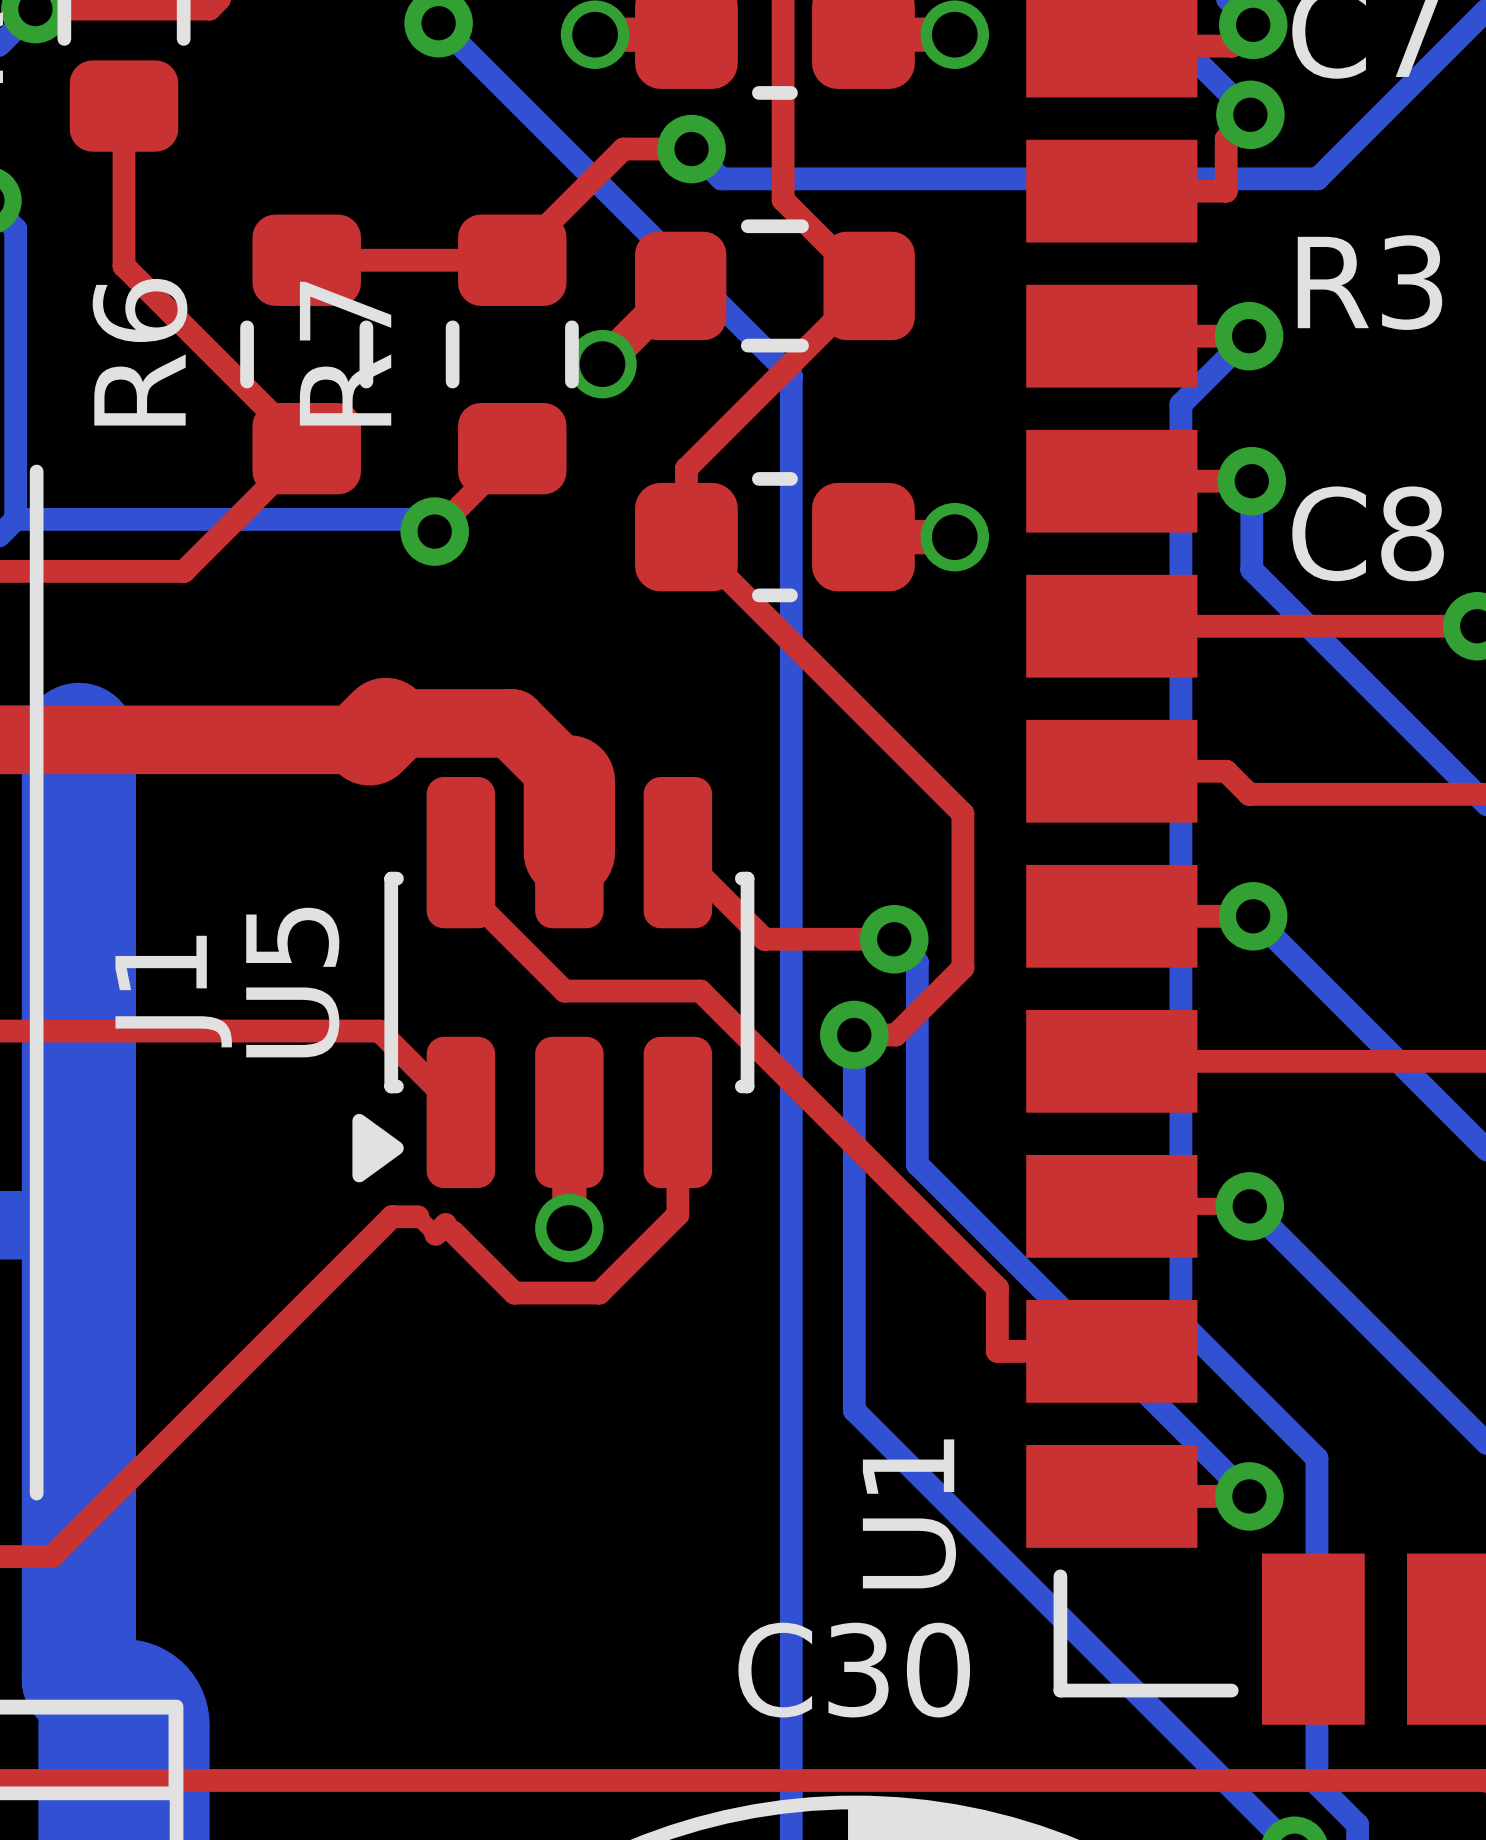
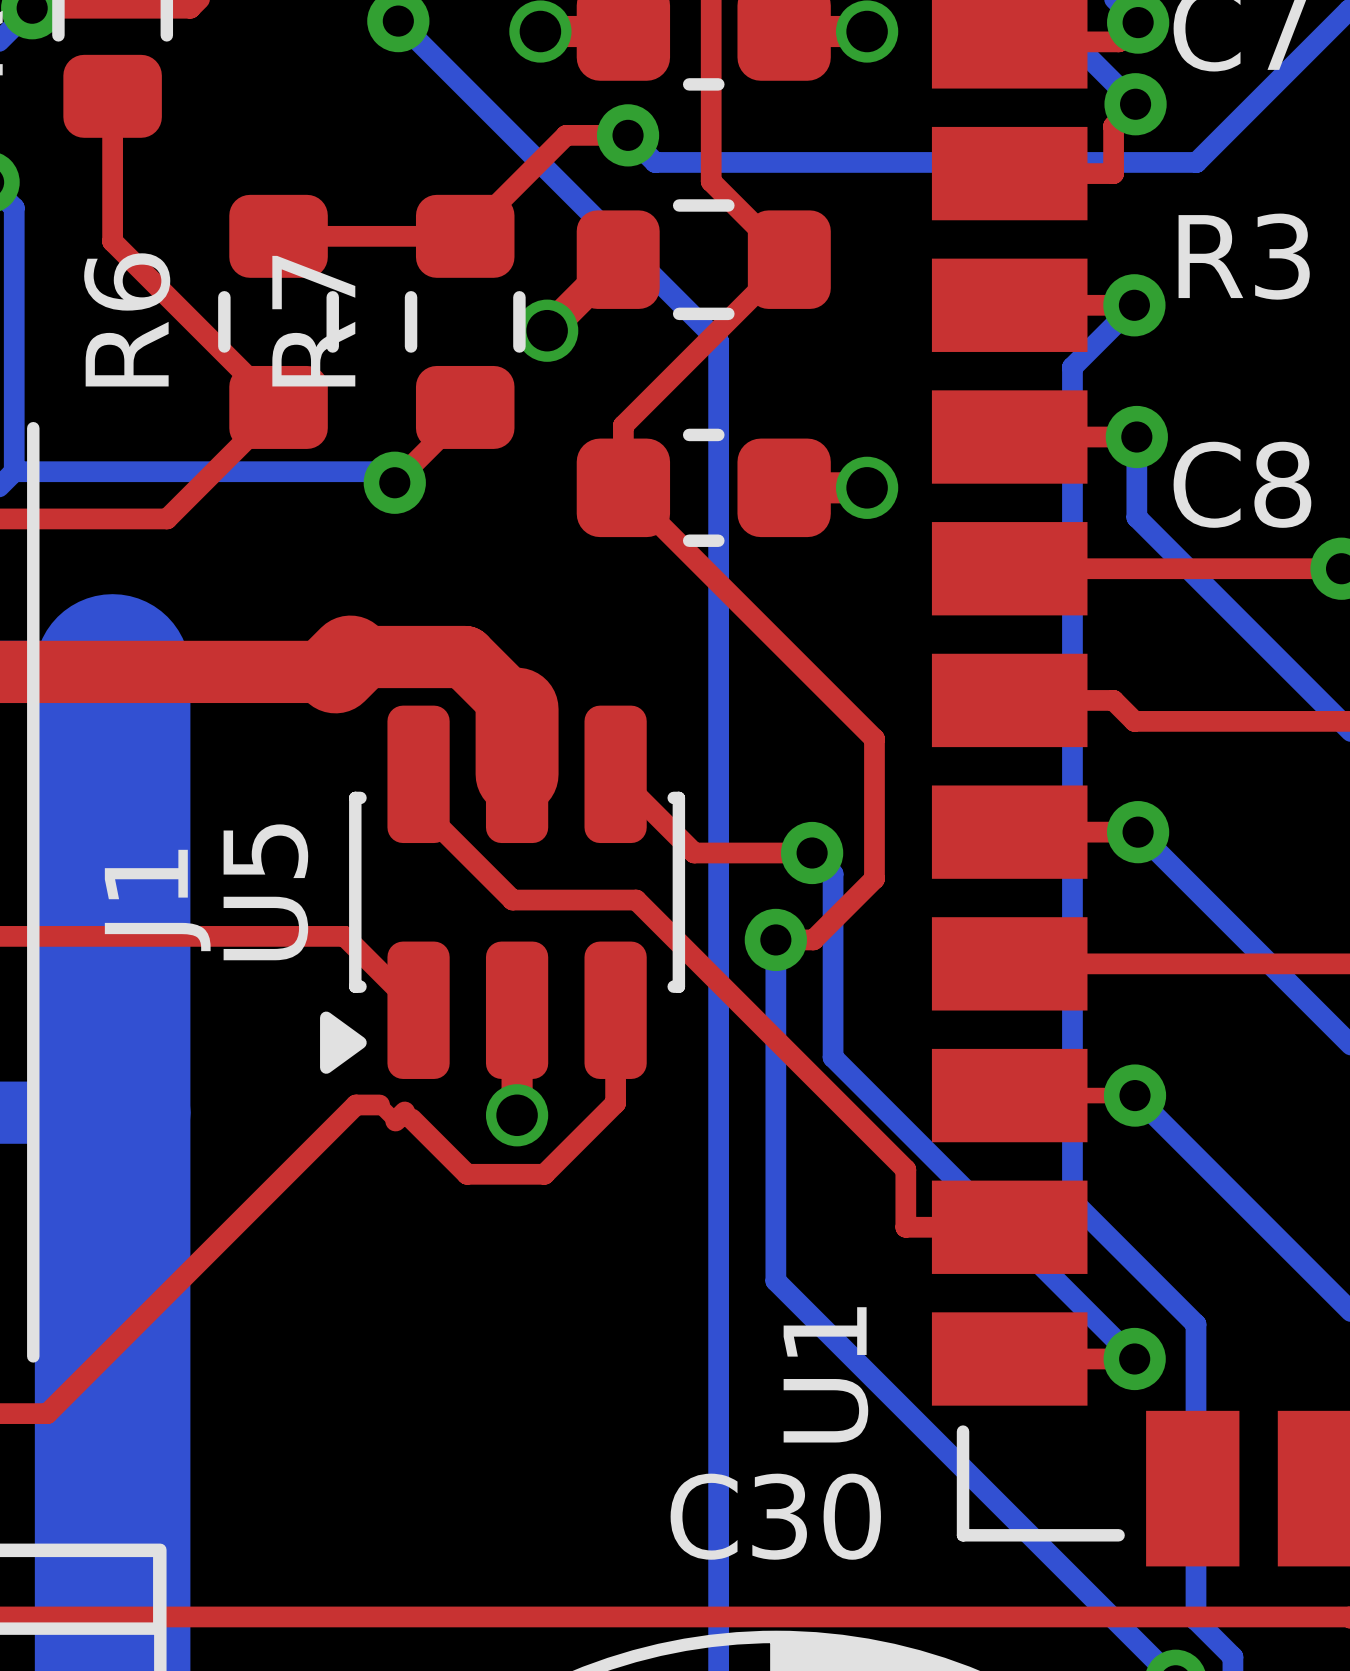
bottom track: (78, 739) (78, 1679) (124, 1724) -> (71, 671) (112, 671) (112, 1566)

